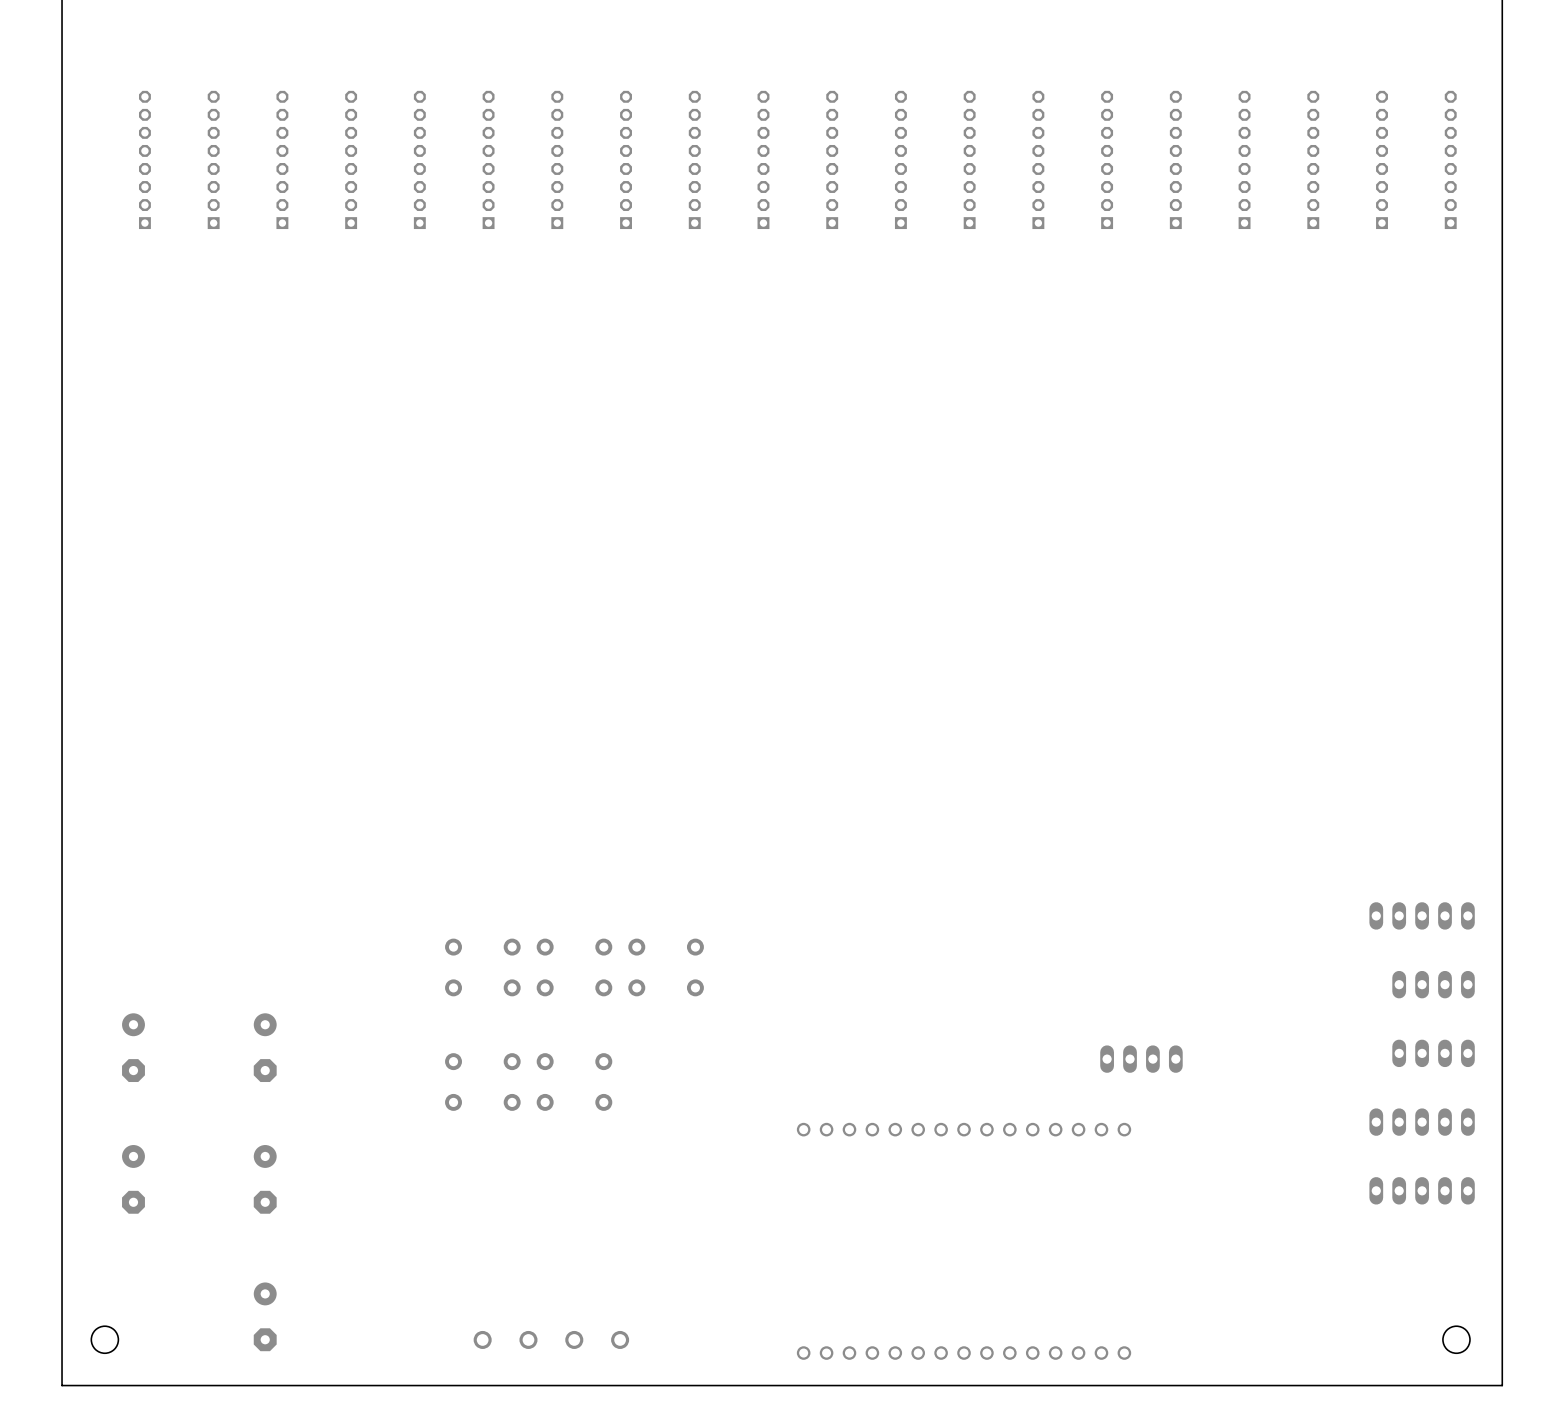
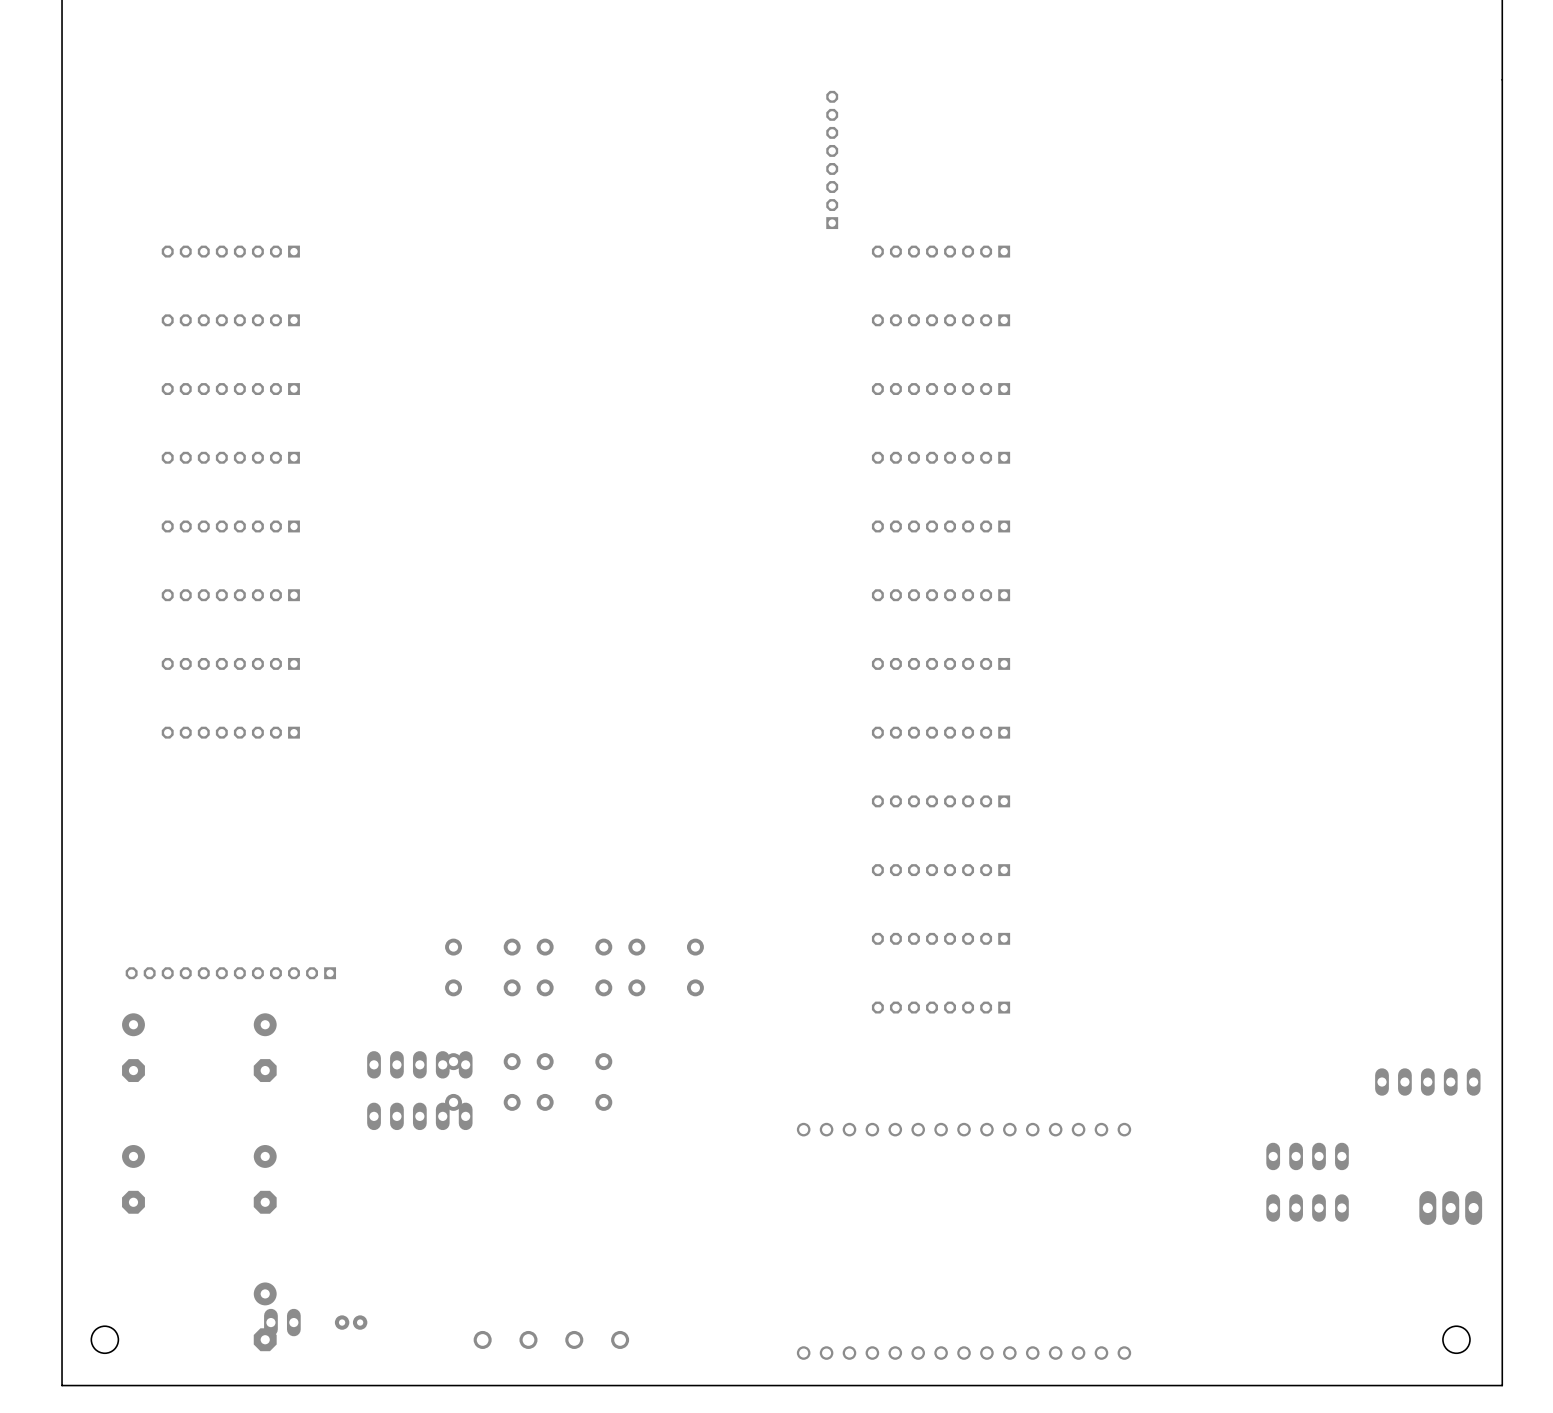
part: (144, 159) -> none
part: (213, 159) -> none
part: (282, 159) -> none
part: (351, 159) -> none
part: (419, 159) -> none
part: (488, 159) -> none
part: (557, 159) -> none
part: (626, 159) -> none
part: (694, 159) -> none
part: (763, 159) -> none
part: (900, 159) -> none
part: (969, 159) -> none
part: (1038, 159) -> none
part: (1107, 159) -> none
part: (1175, 159) -> none
part: (1244, 159) -> none
part: (1313, 159) -> none
part: (1382, 159) -> none
part: (1450, 159) -> none
part: none -> (230, 251)
part: none -> (941, 251)
part: none -> (230, 320)
part: none -> (941, 320)
part: none -> (230, 389)
part: none -> (941, 389)
part: none -> (230, 457)
part: none -> (941, 457)
part: none -> (230, 526)
part: none -> (941, 526)
part: none -> (230, 595)
part: none -> (941, 595)
part: none -> (230, 663)
part: none -> (941, 663)
part: none -> (230, 732)
part: none -> (941, 732)
part: none -> (941, 801)
part: none -> (941, 870)
part: (1422, 915) -> none
part: none -> (941, 938)
part: none -> (230, 973)
part: (1433, 984) -> none
part: none -> (941, 1007)
part: (1433, 1053) -> none
part: (1141, 1059) -> none
part: none -> (419, 1064)
part: none -> (419, 1116)
part position: (1422, 1122) -> (1427, 1082)
part: none -> (1307, 1156)
part: (1422, 1190) -> none
part: none -> (1307, 1208)
part: none -> (1450, 1208)
part: none -> (282, 1322)
part: none -> (351, 1322)

